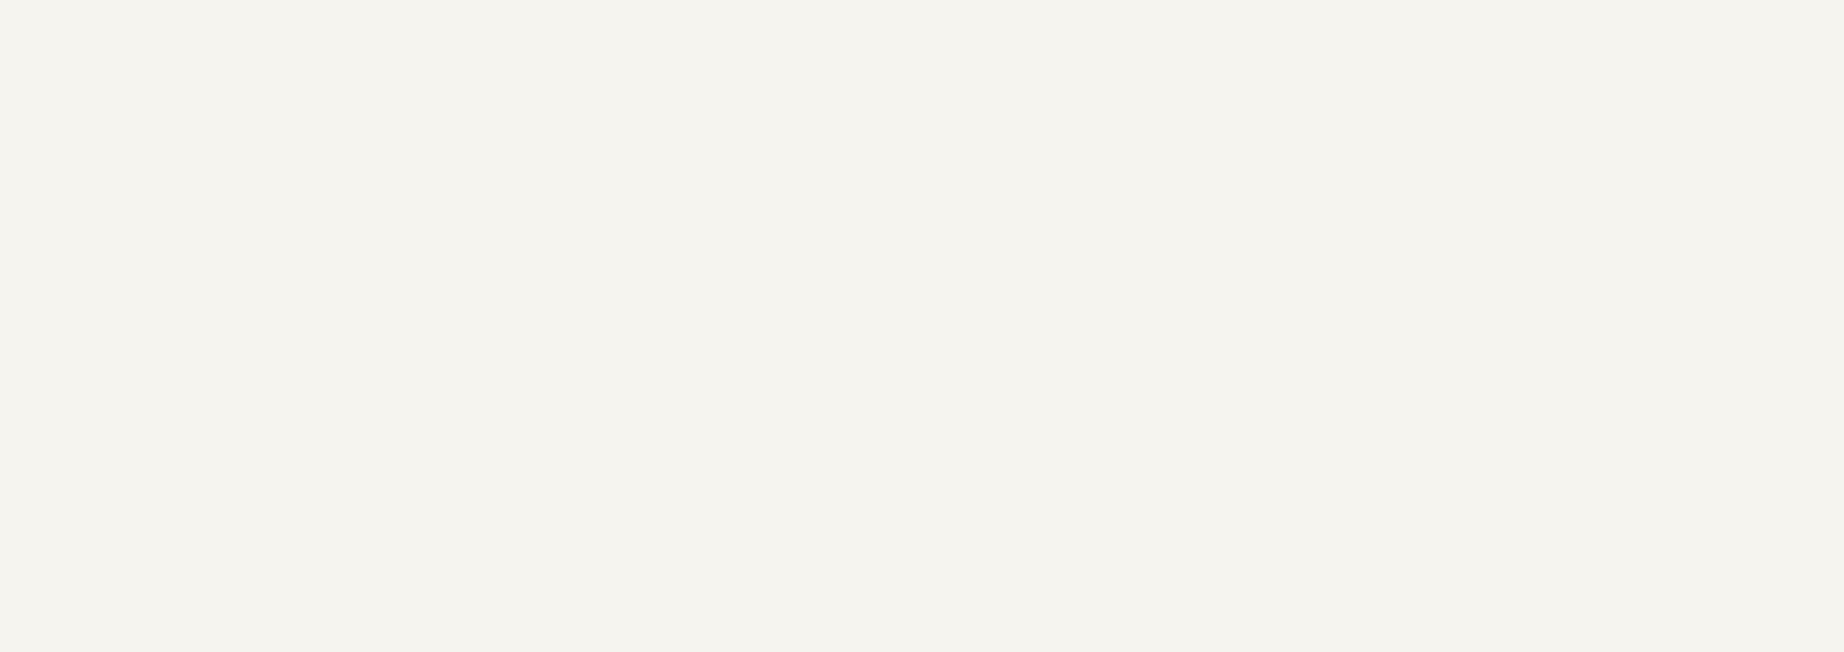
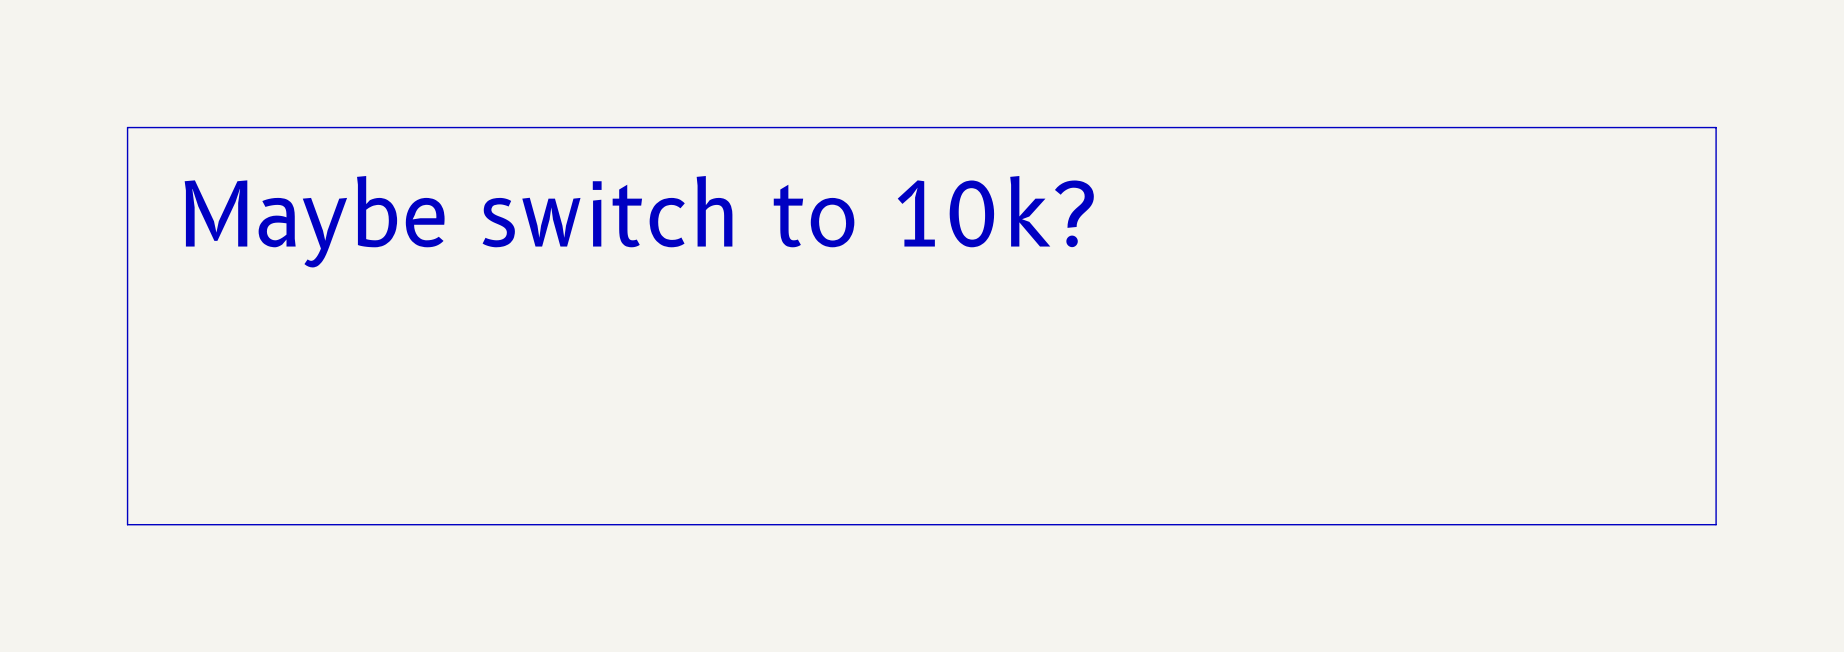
line: none -> (127, 127) (1716, 127) (1716, 524) (127, 524) (127, 127)
text: none -> Maybe switch to 10k? (639, 221)

